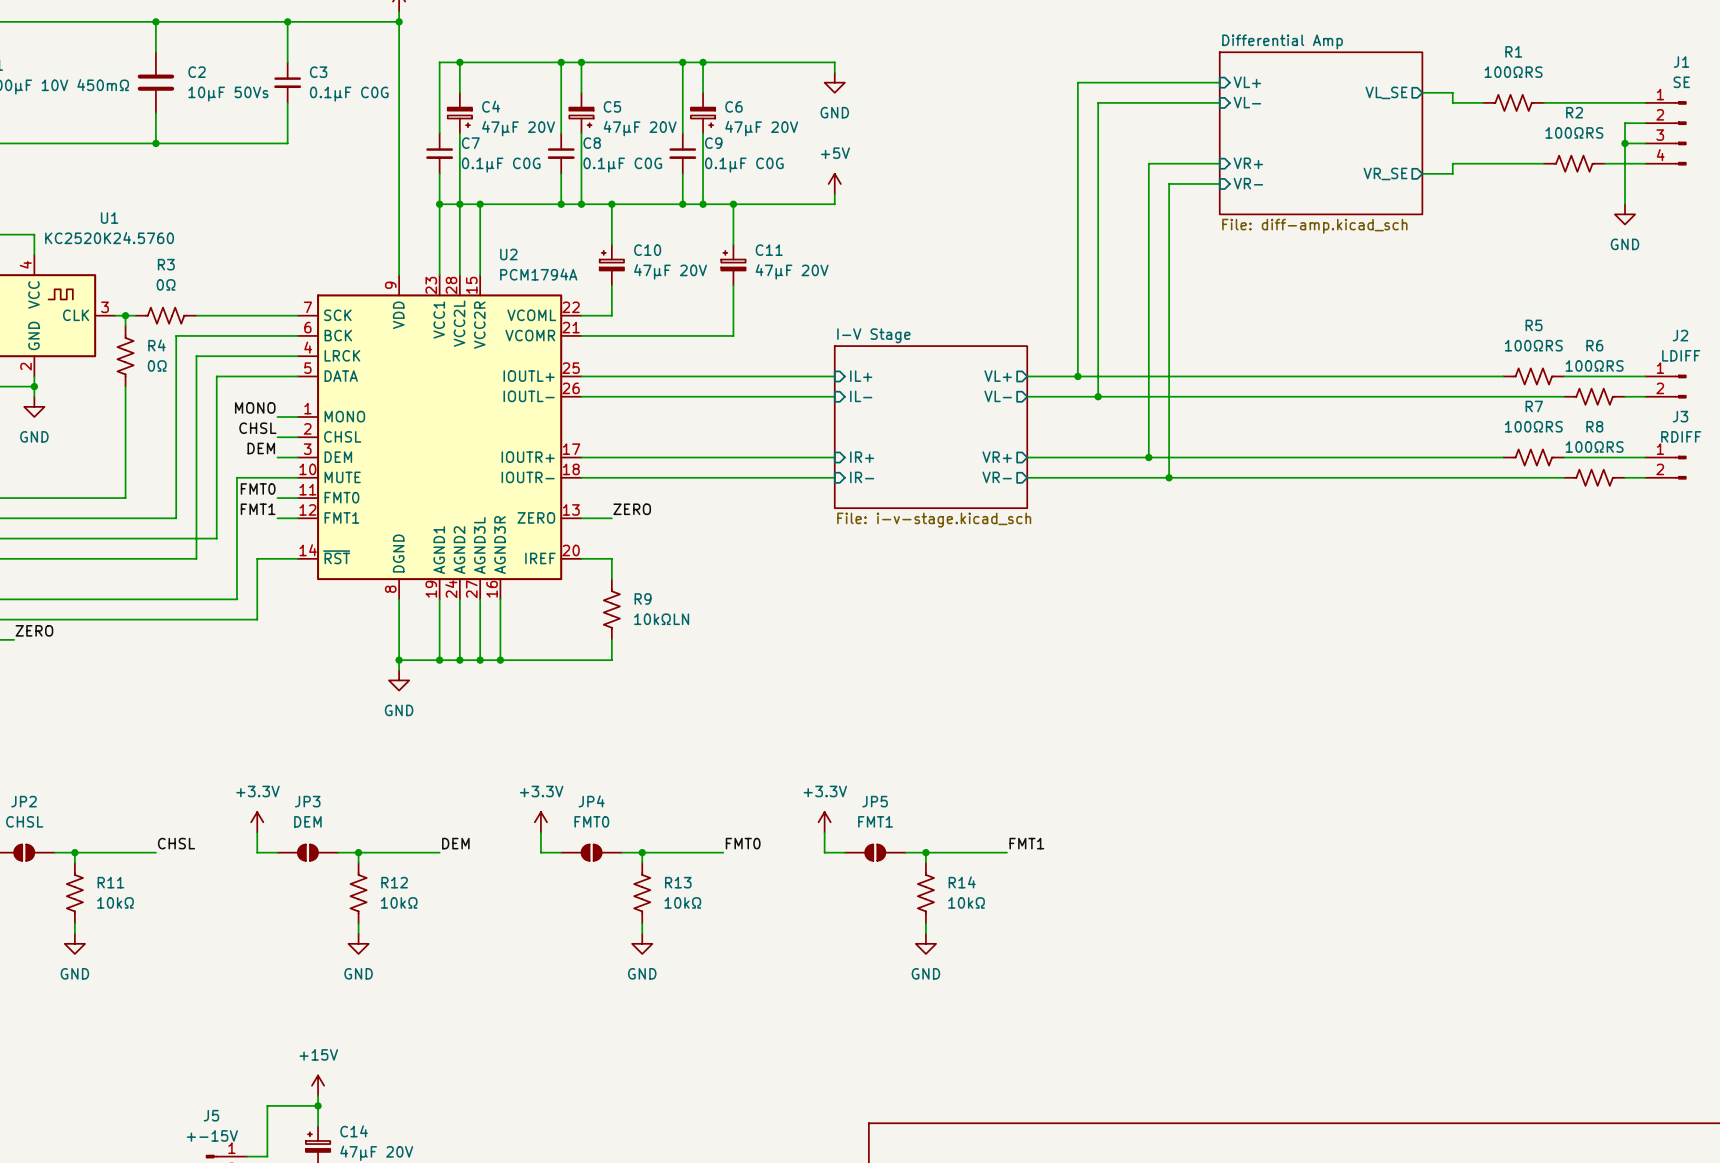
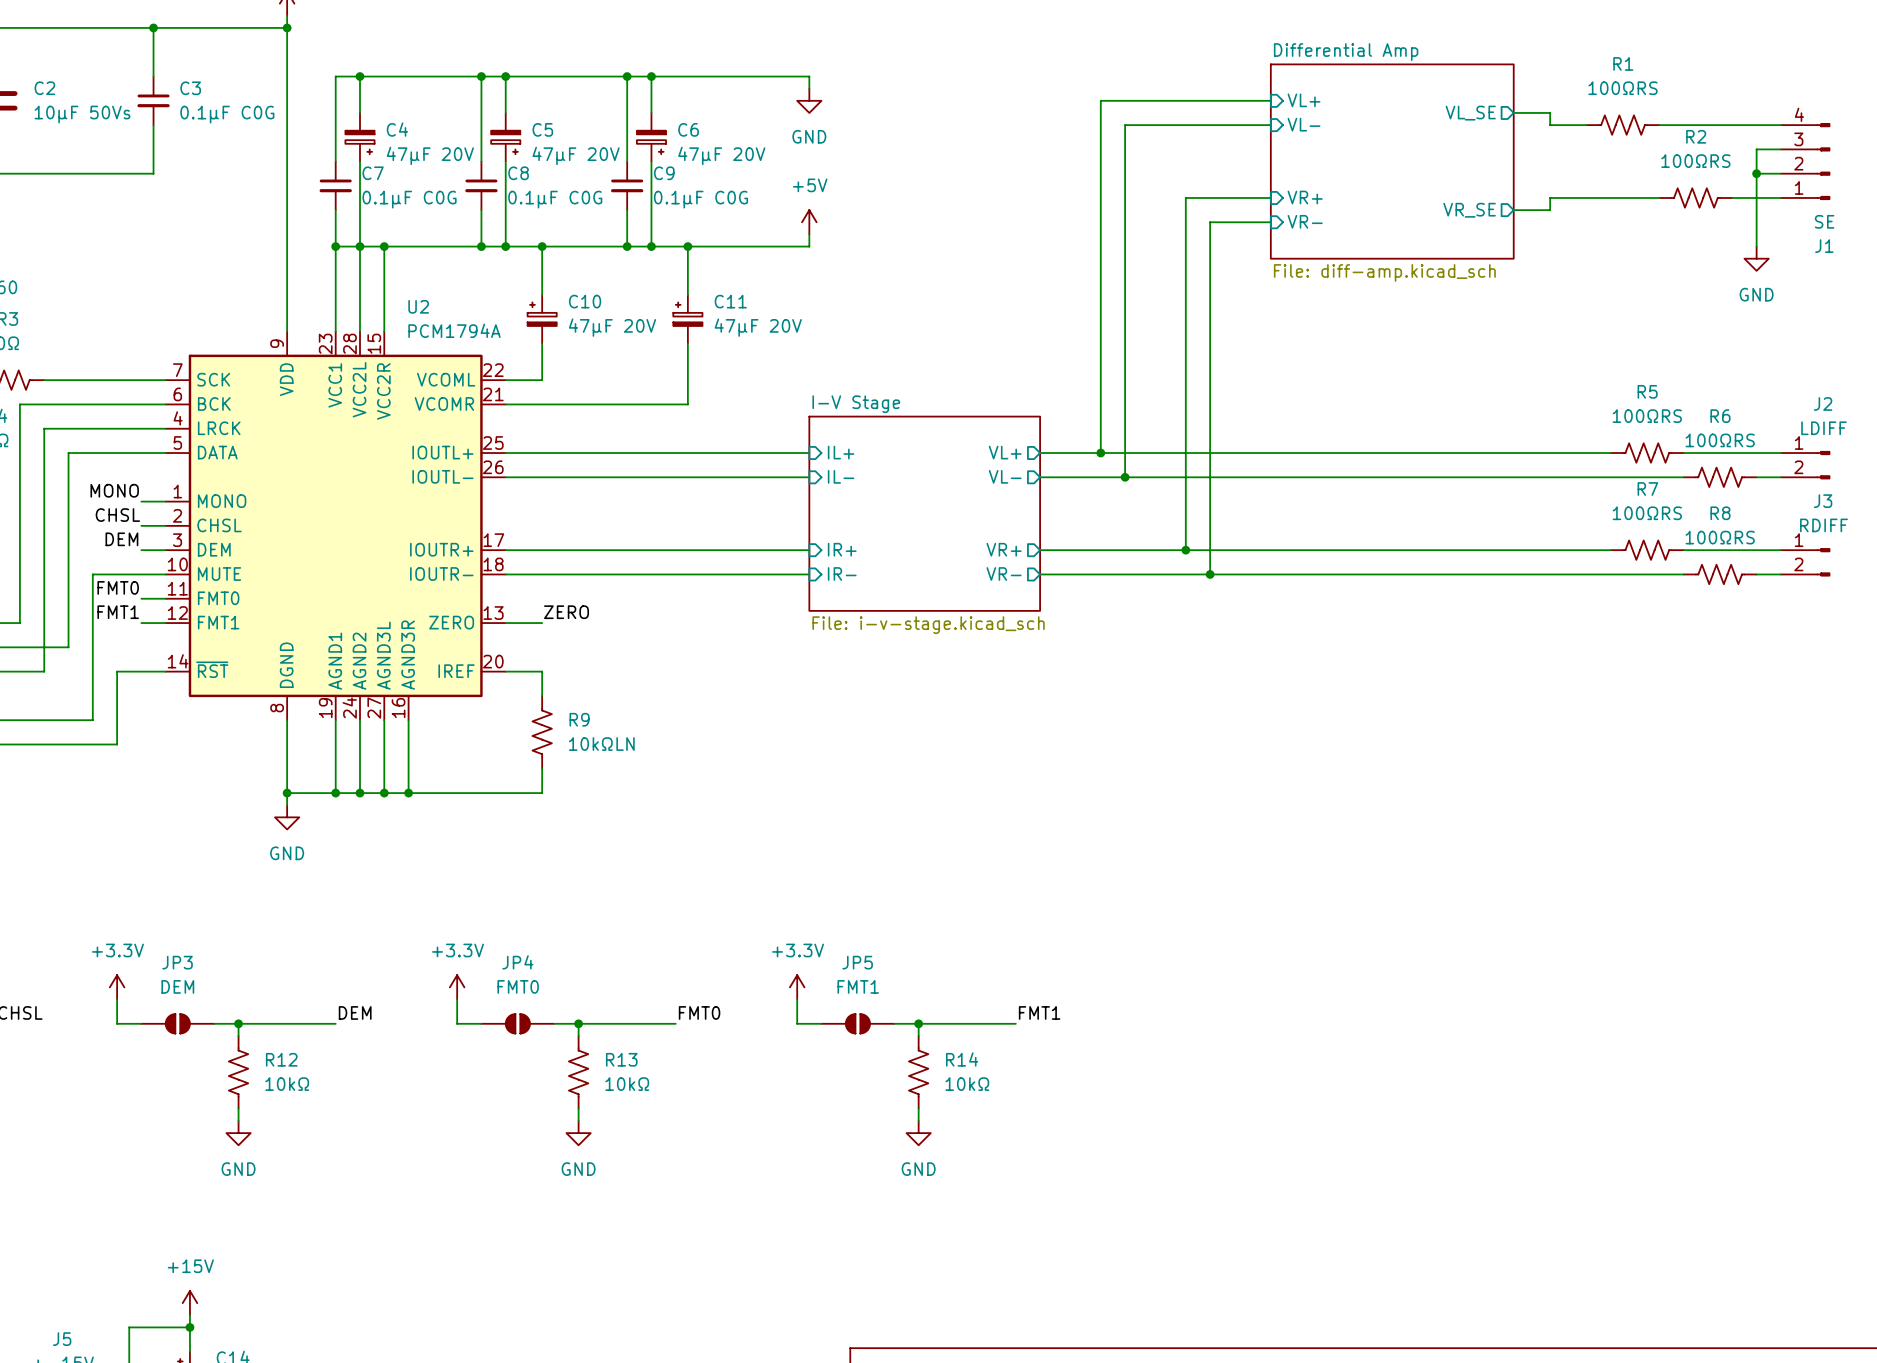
J1 flip: as is (1680, 133) -> up-down (1823, 161)

